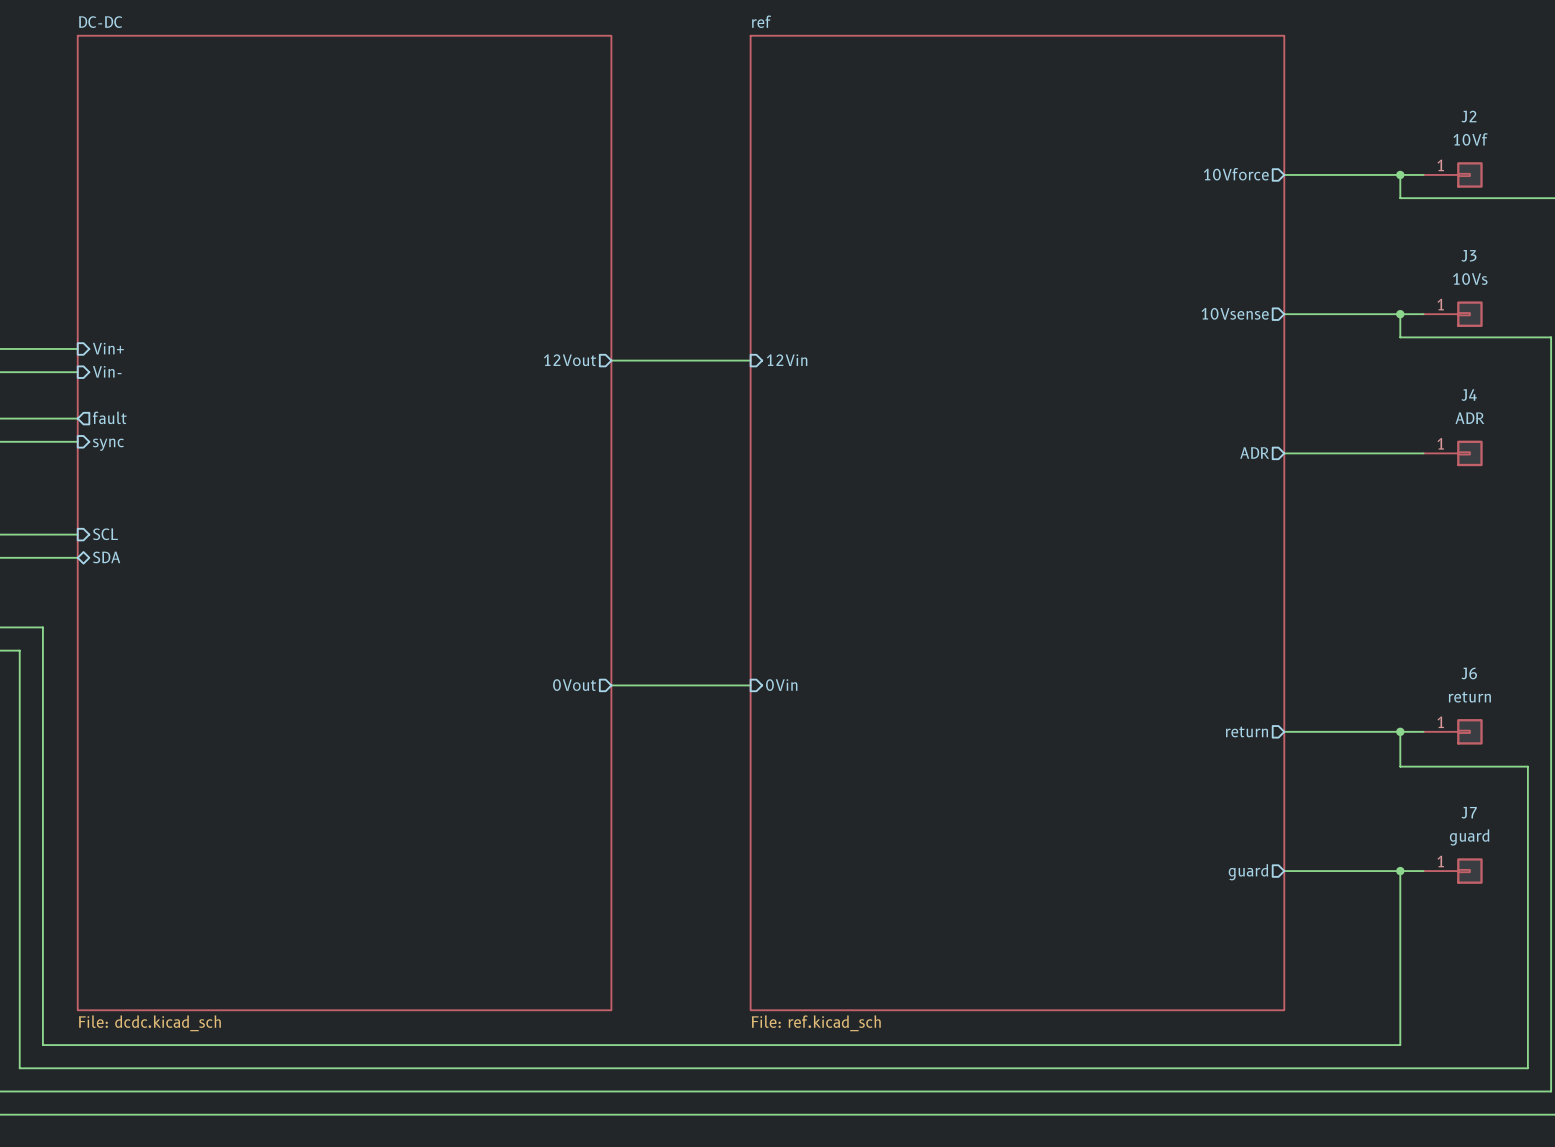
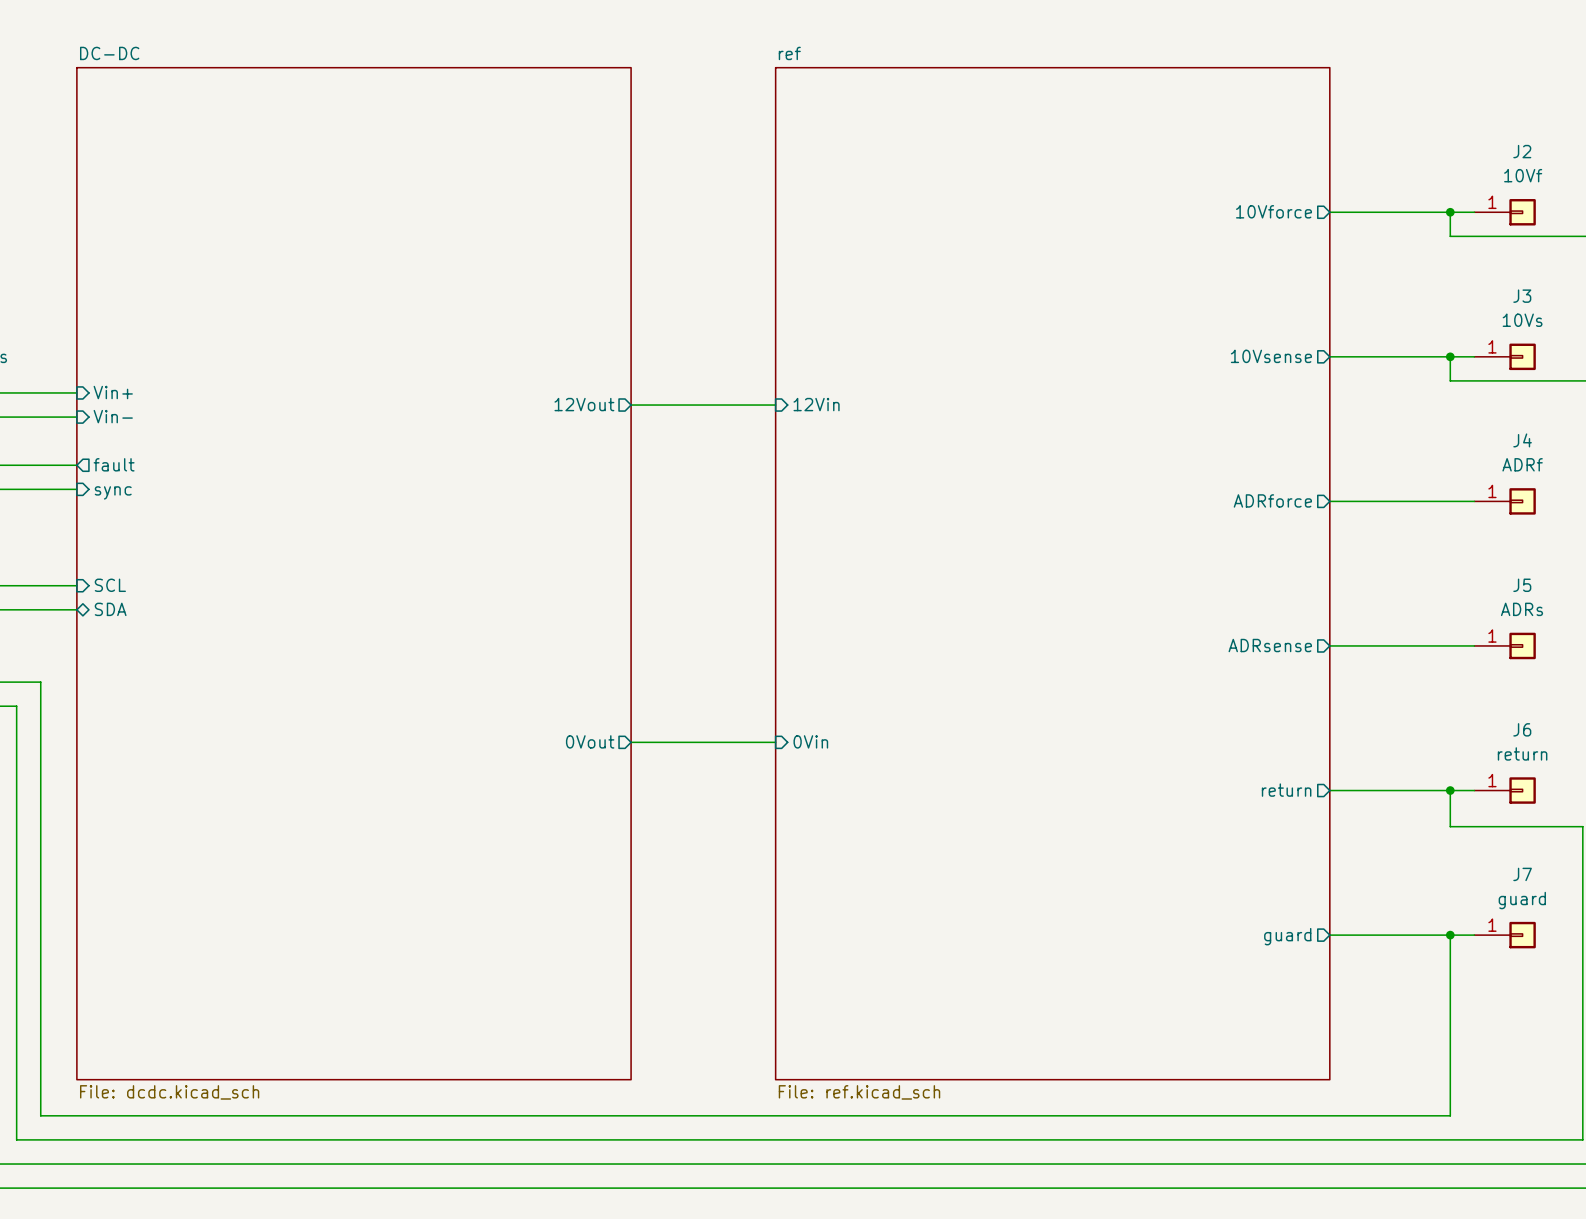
J4 value: ADR (1469, 418) -> ADRf (1522, 464)
sheet pin: ADR (1254, 452) -> ADRforce (1272, 500)
sheet pin: none -> ADRsense (1270, 645)
wire: none -> (1329, 645) (1474, 645)
J5: none -> ADRs (1505, 645)

